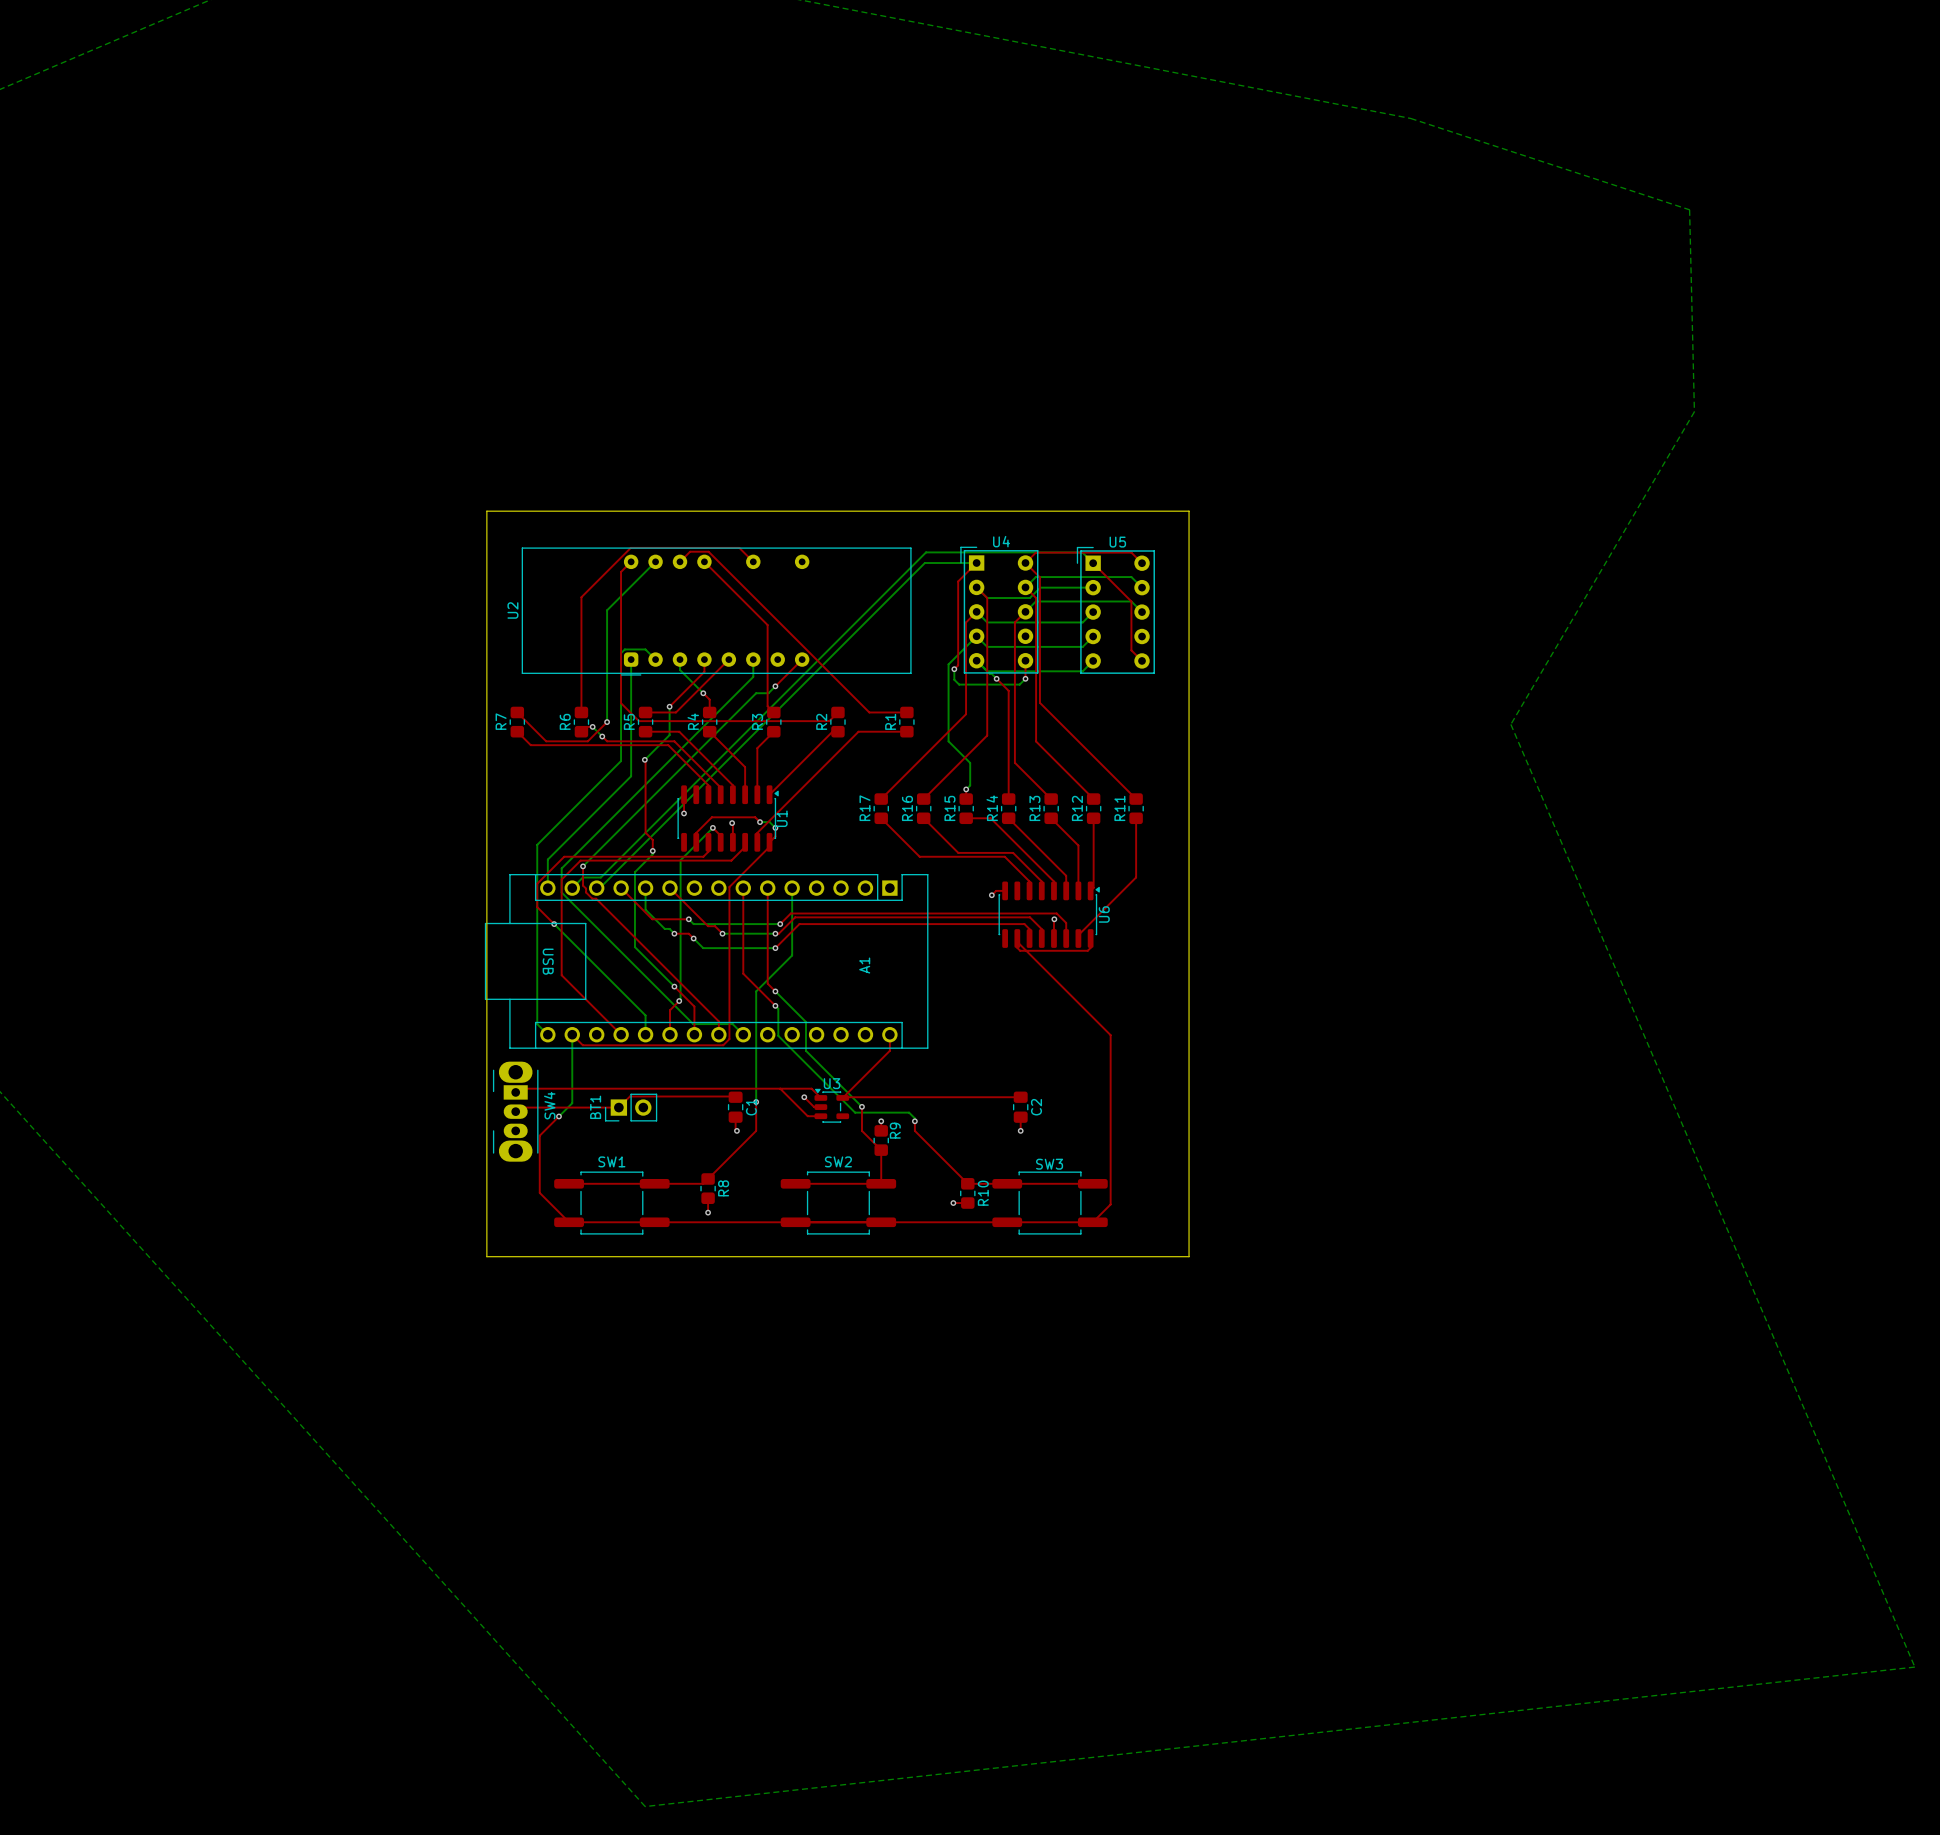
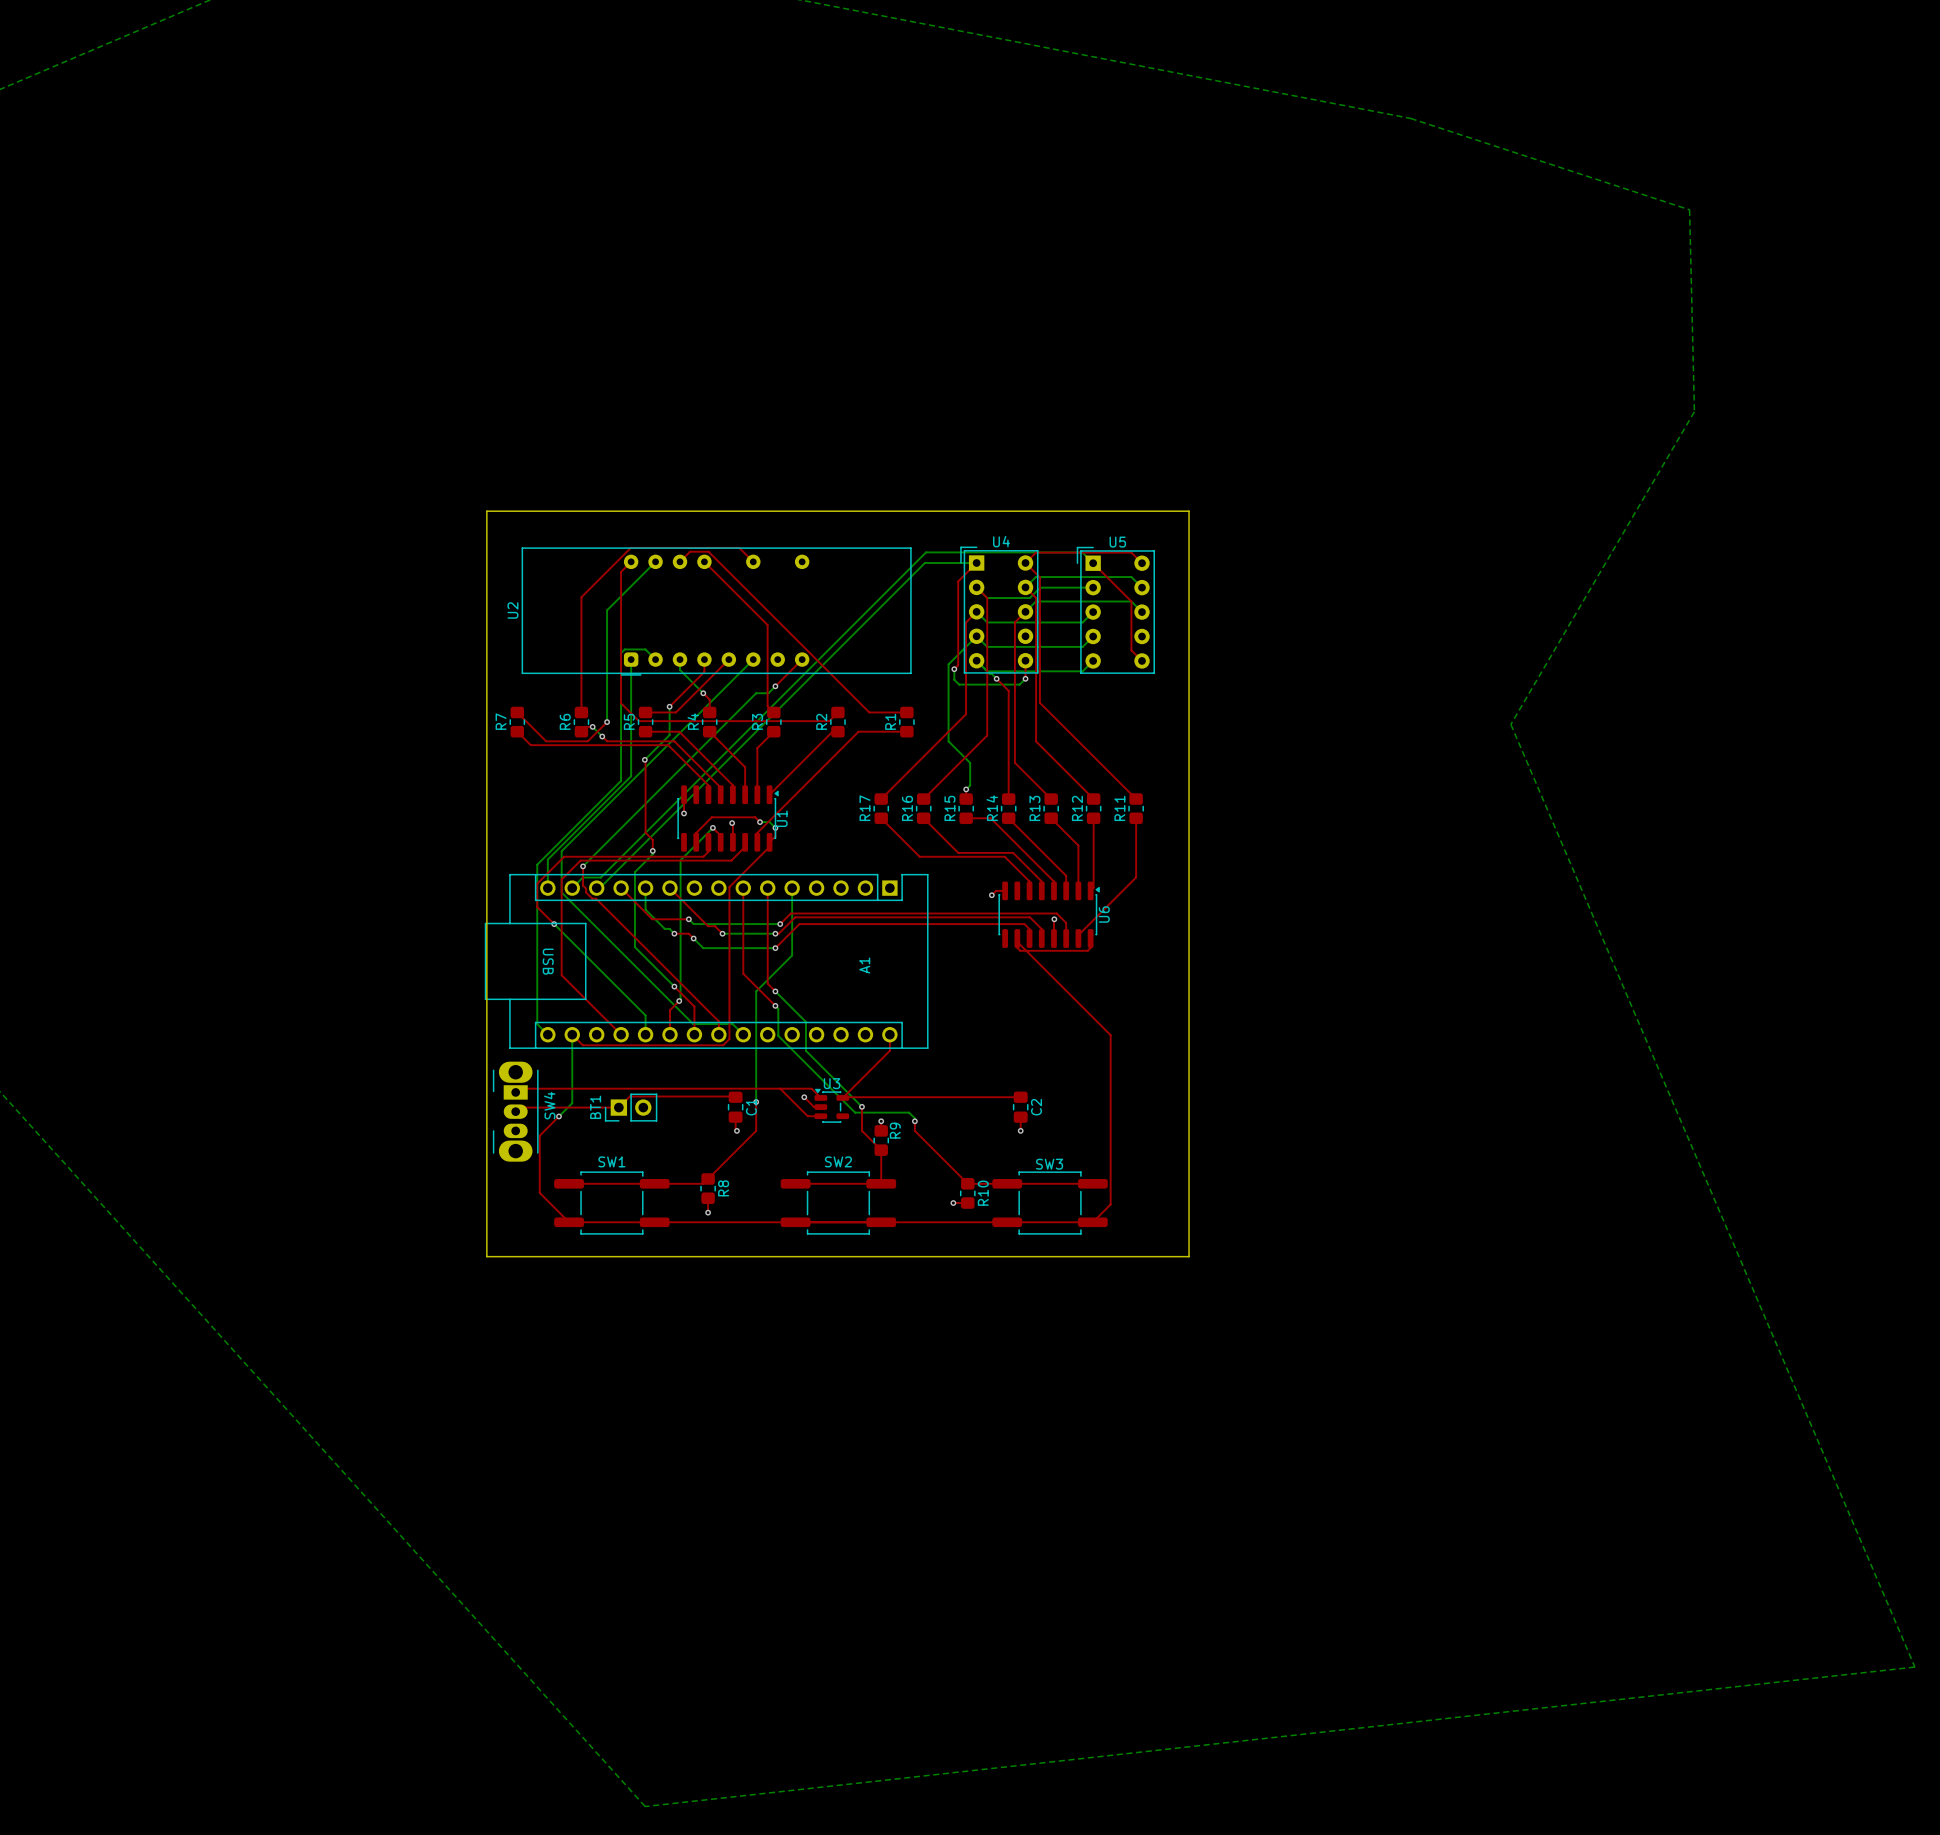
bottom track: (753, 659) (753, 676) (561, 868) -> (753, 659) (561, 851) (561, 868)
bottom track: (621, 761) (537, 844) (537, 864) -> (621, 761) (621, 780) (537, 864)

